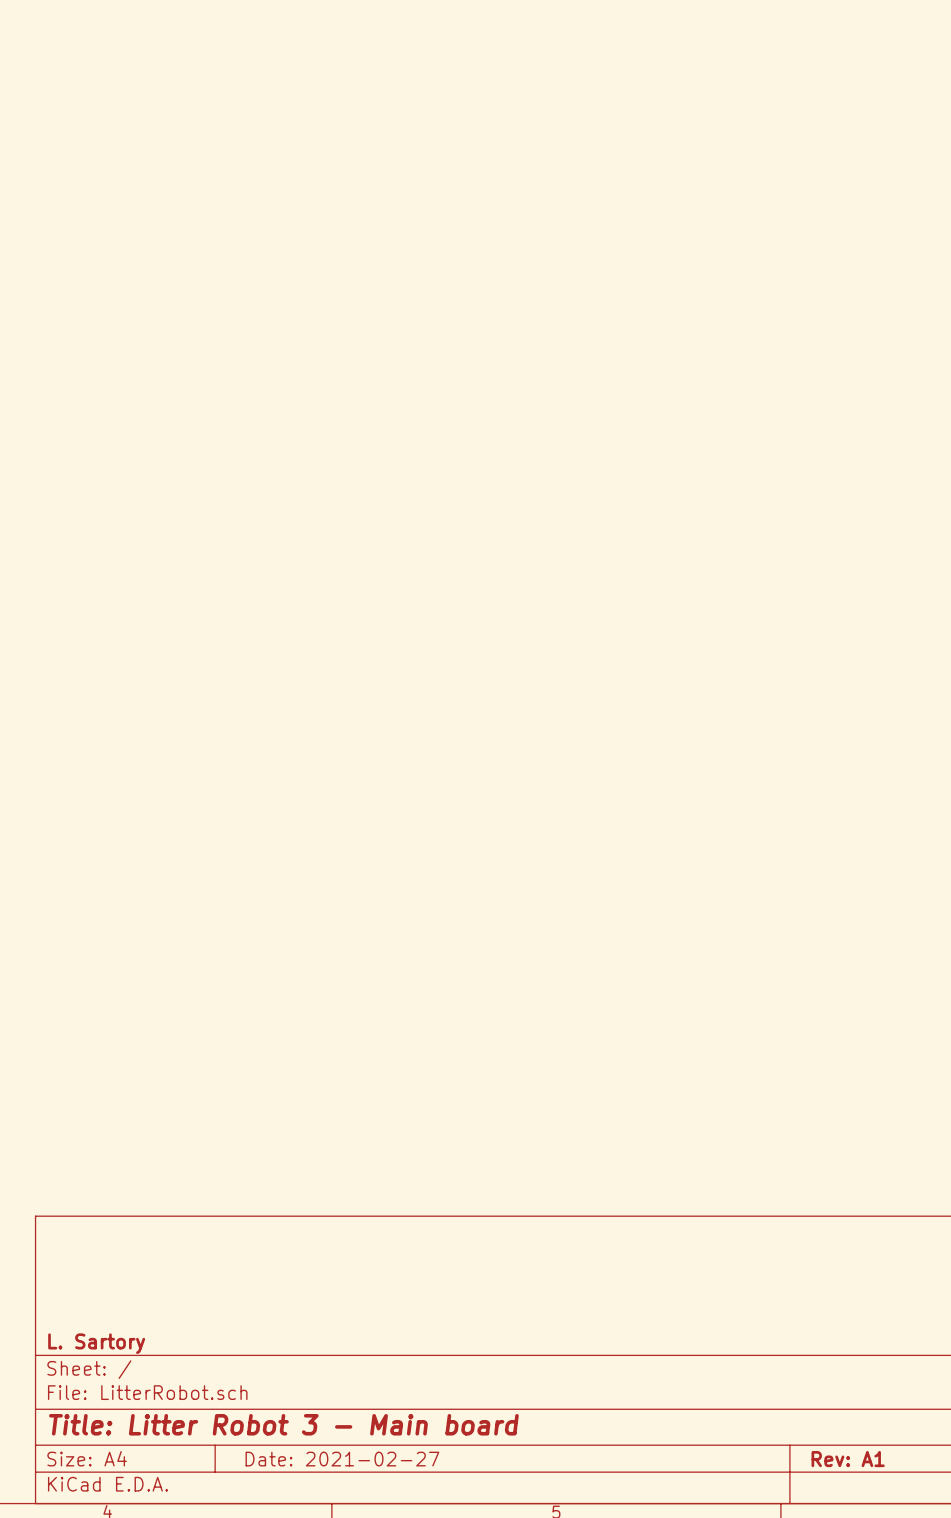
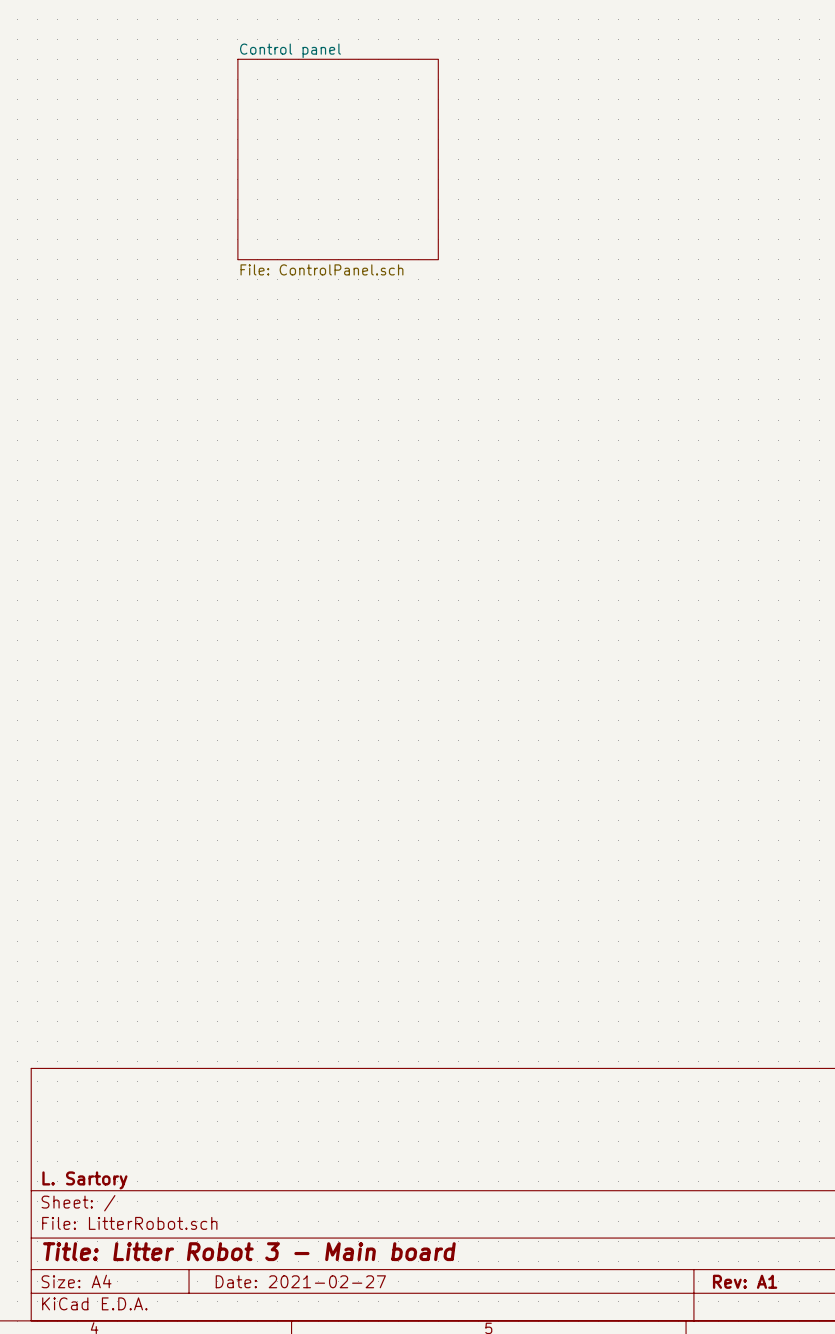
sheet Control panel: none -> File: ControlPanel.sch (338, 159)

